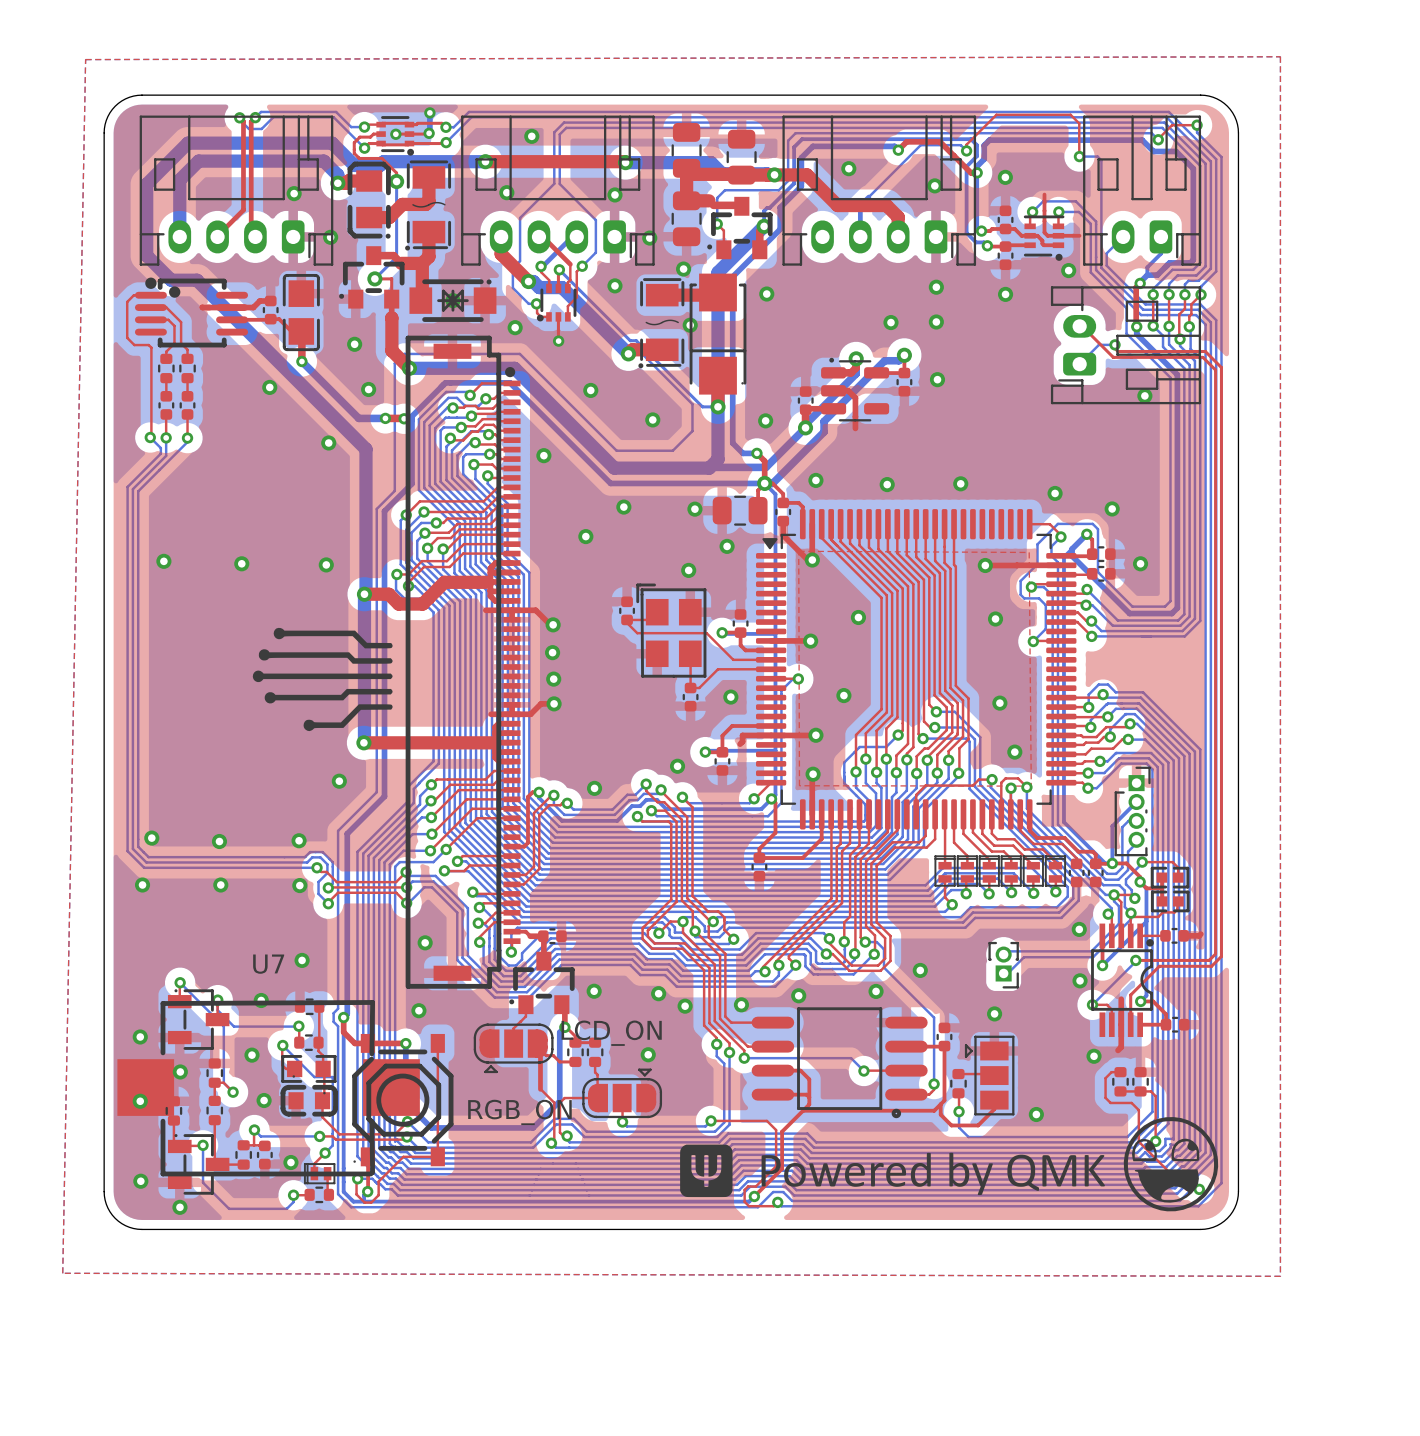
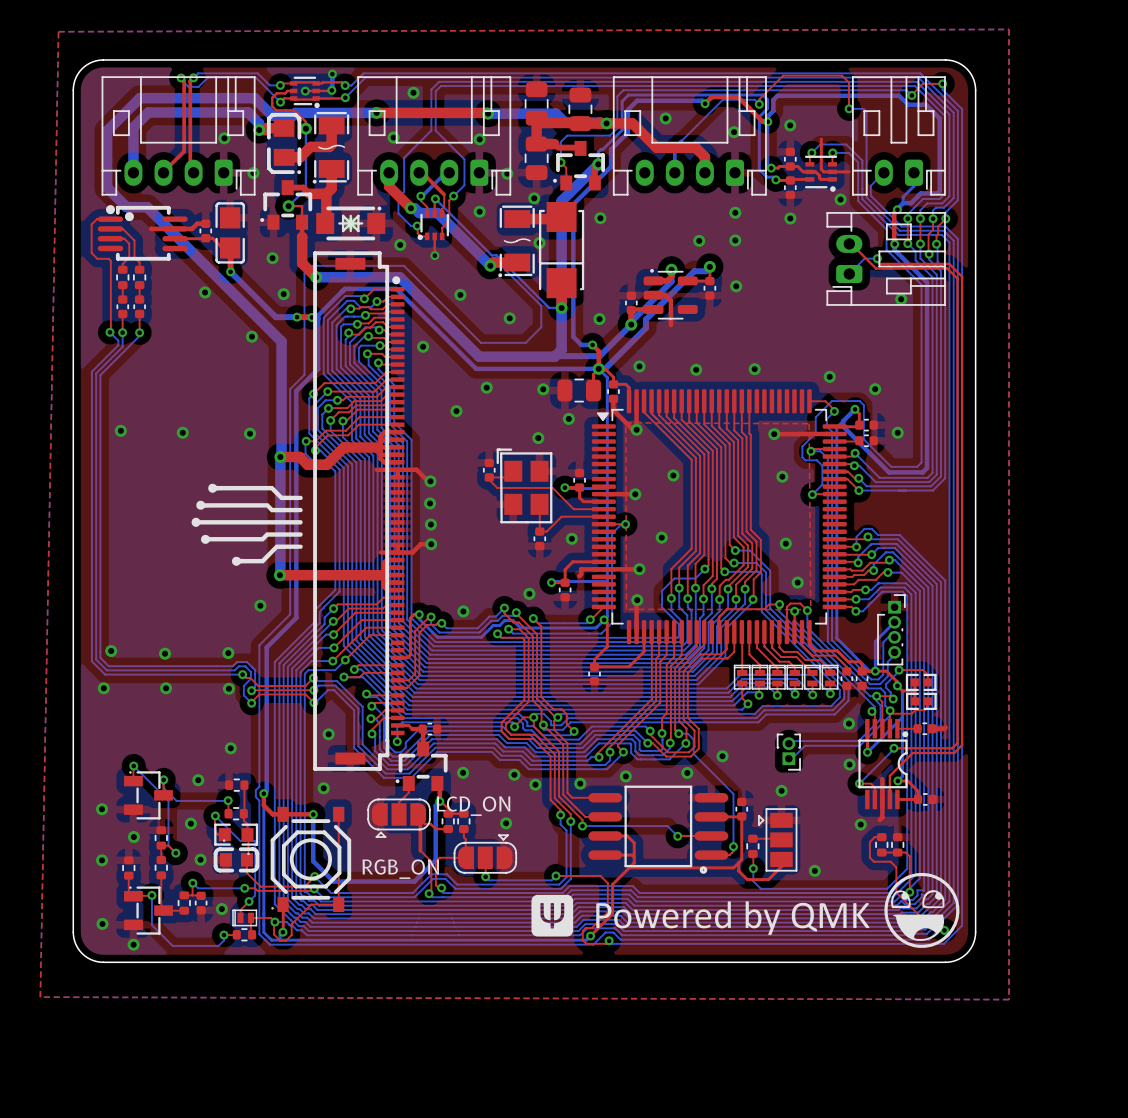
U7: (268, 1088) -> none

